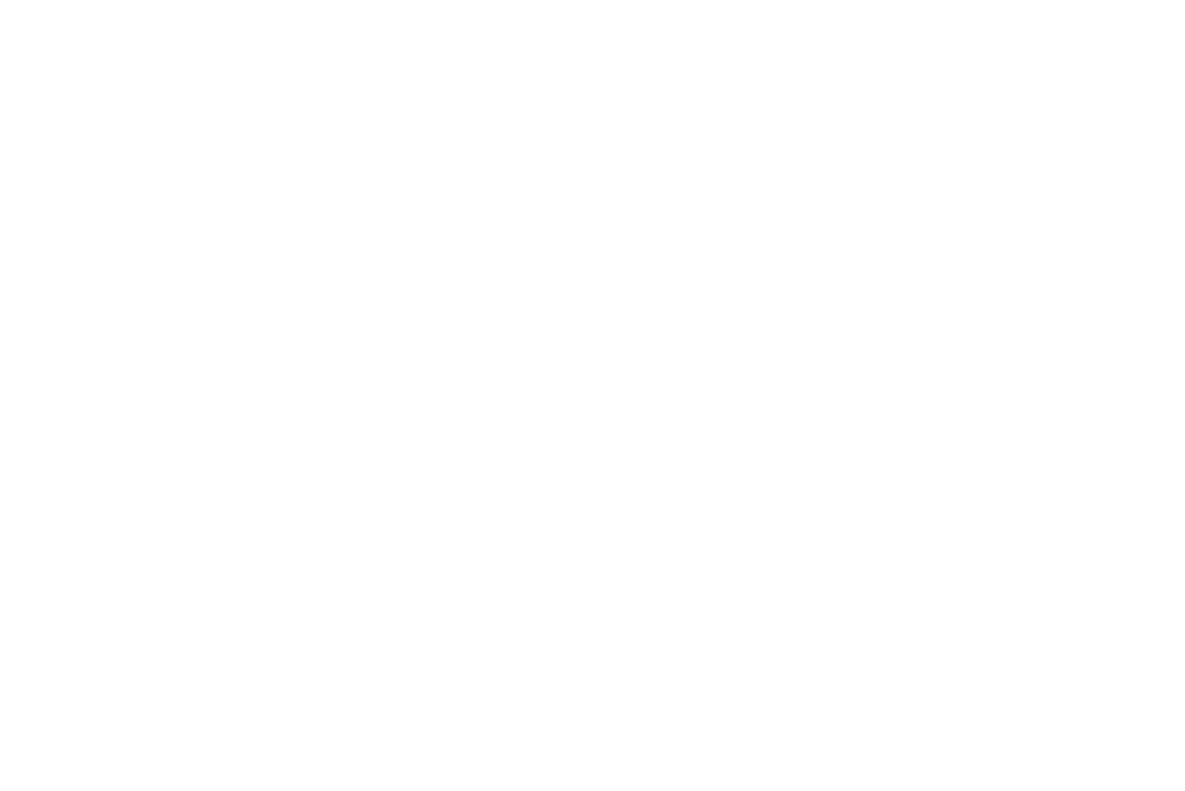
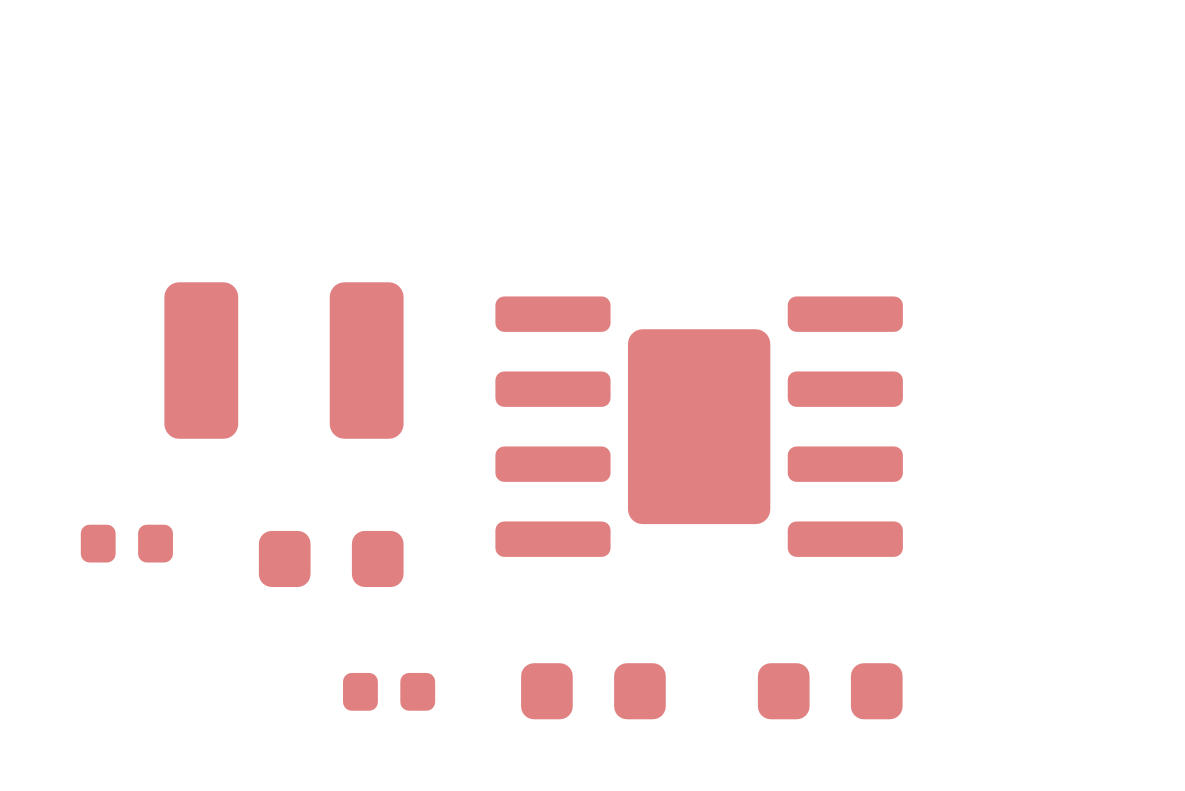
part: none -> (283, 360)
part: none -> (699, 426)
part: none -> (126, 543)
part: none -> (331, 558)
part: none -> (389, 691)
part: none -> (593, 691)
part: none -> (830, 691)

